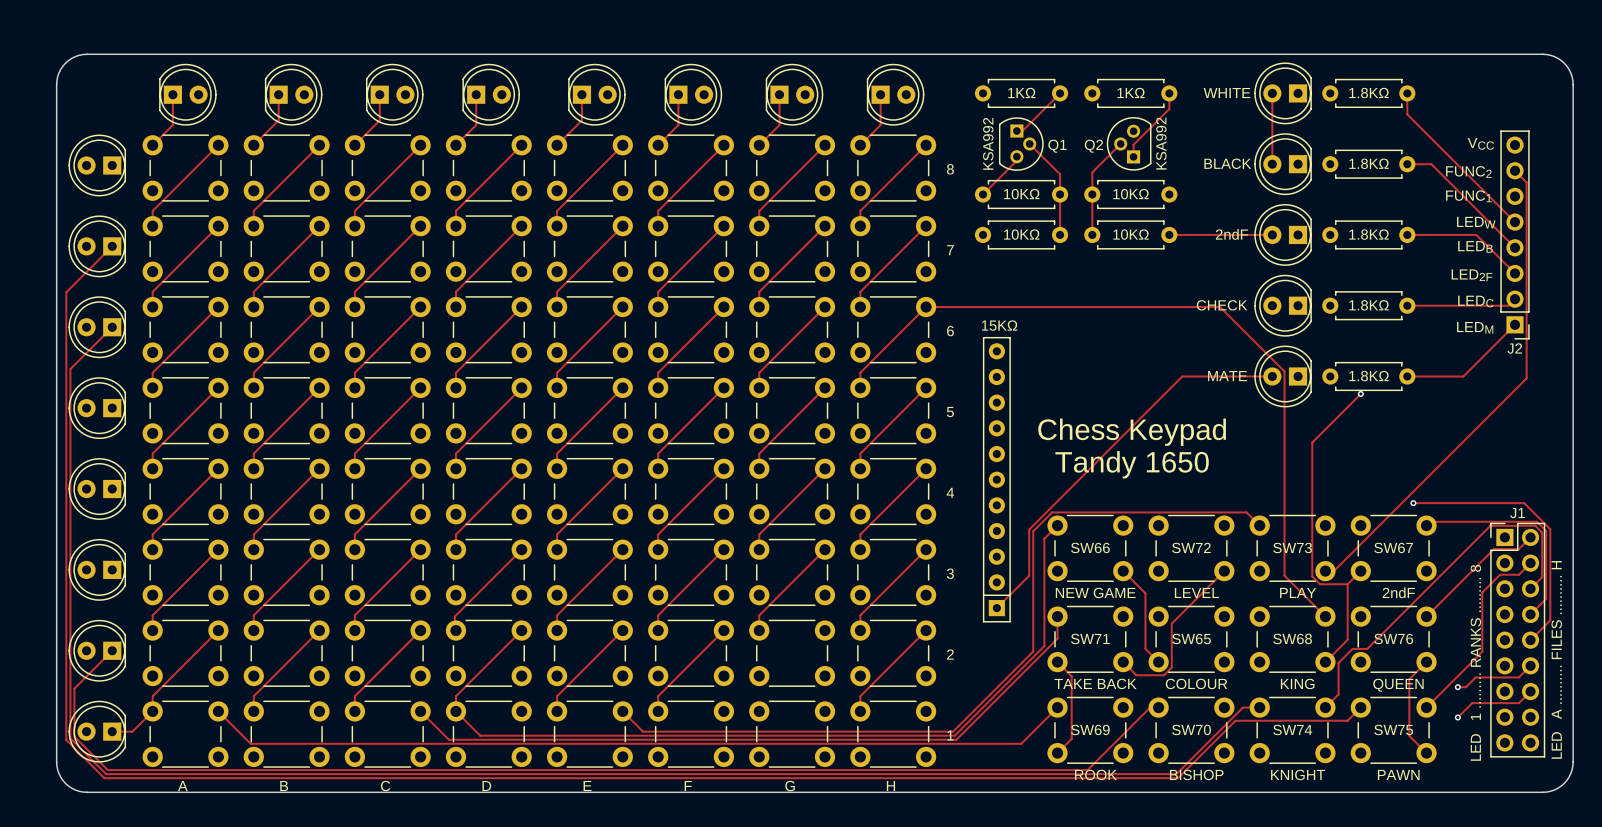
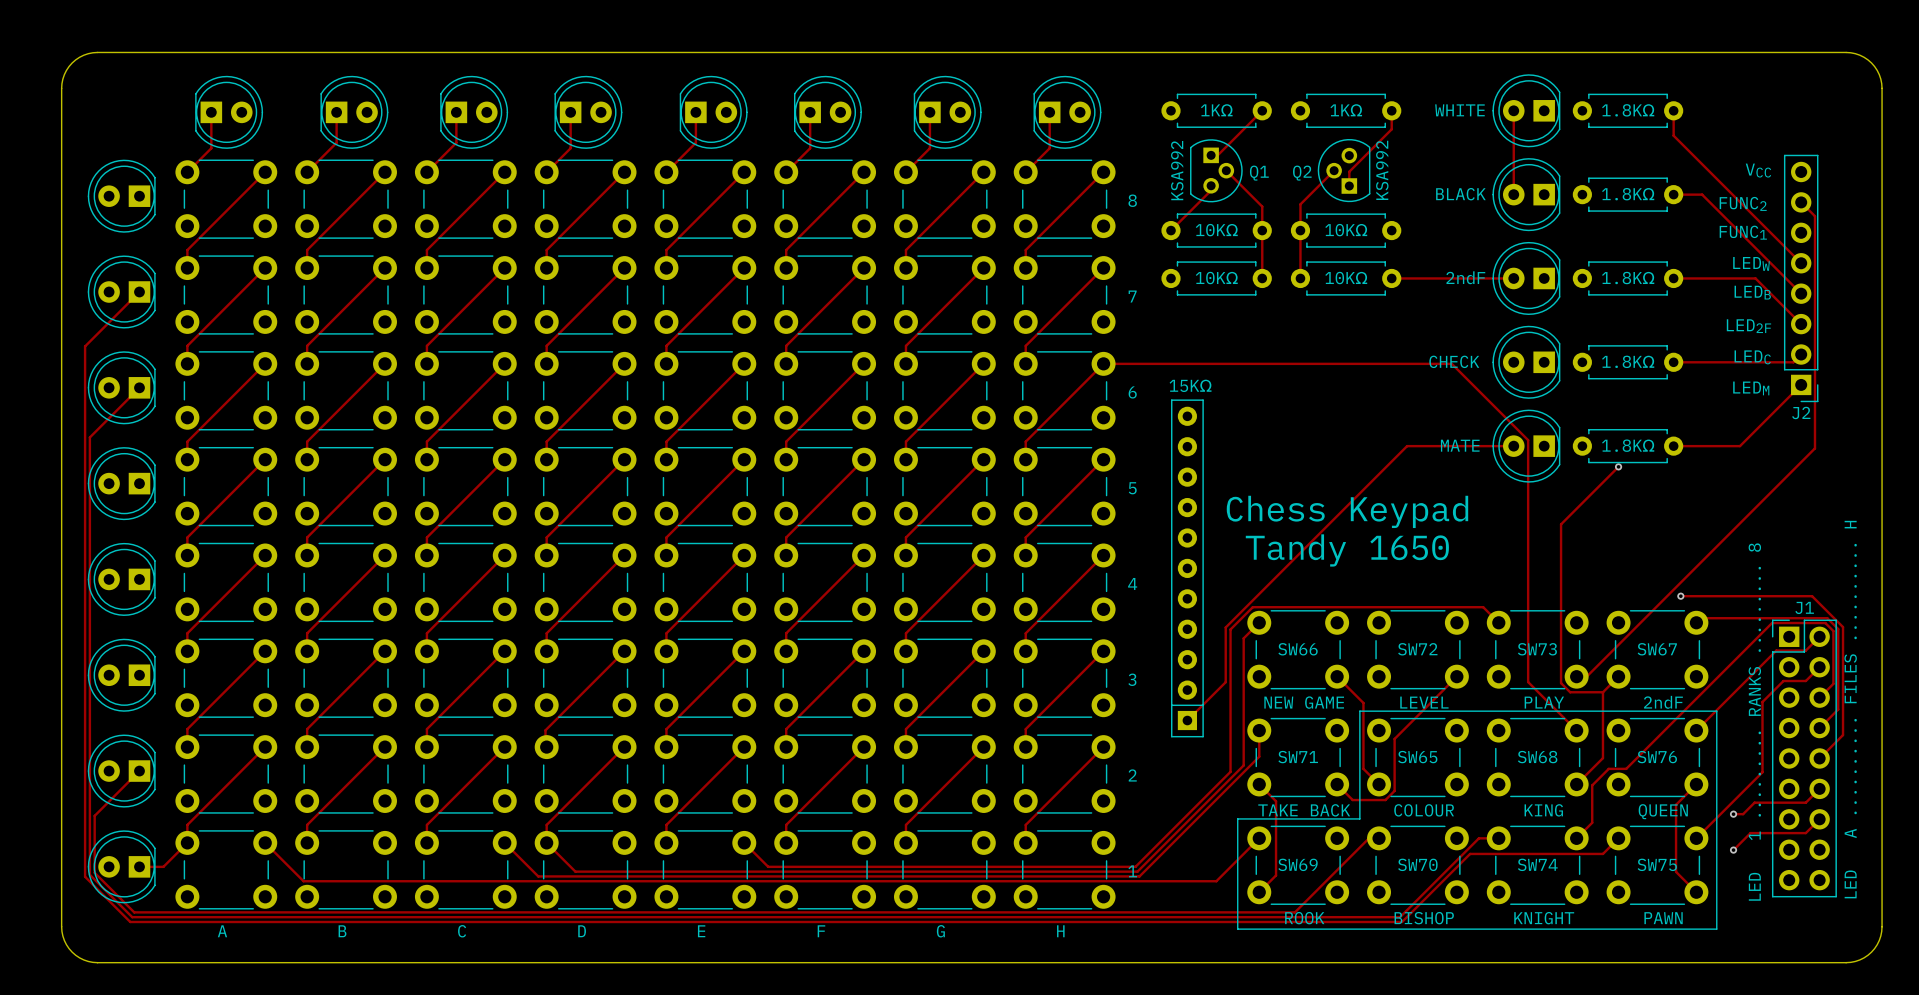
board edge: (86, 54) (1542, 54) (1554, 56) (1566, 66) (1570, 73) (1573, 84) (1573, 761) (1570, 773) (1566, 780) (1557, 788) (1542, 792) (86, 792) (75, 790) (65, 783) (60, 777) (56, 761) (56, 84) (58, 73) (65, 63) (75, 56) (86, 54) -> (97, 52) (83, 55) (72, 63) (64, 74) (61, 88) (61, 926) (66, 944) (79, 957) (97, 962) (1846, 962) (1864, 957) (1877, 944) (1882, 926) (1882, 88) (1877, 70) (1864, 57) (1846, 52) (97, 52)
line: none -> (1359, 711) (1716, 711) (1716, 929) (1237, 929) (1237, 818) (1359, 818) (1359, 711)
track: none -> (983, 747) (905, 824) (905, 842)

